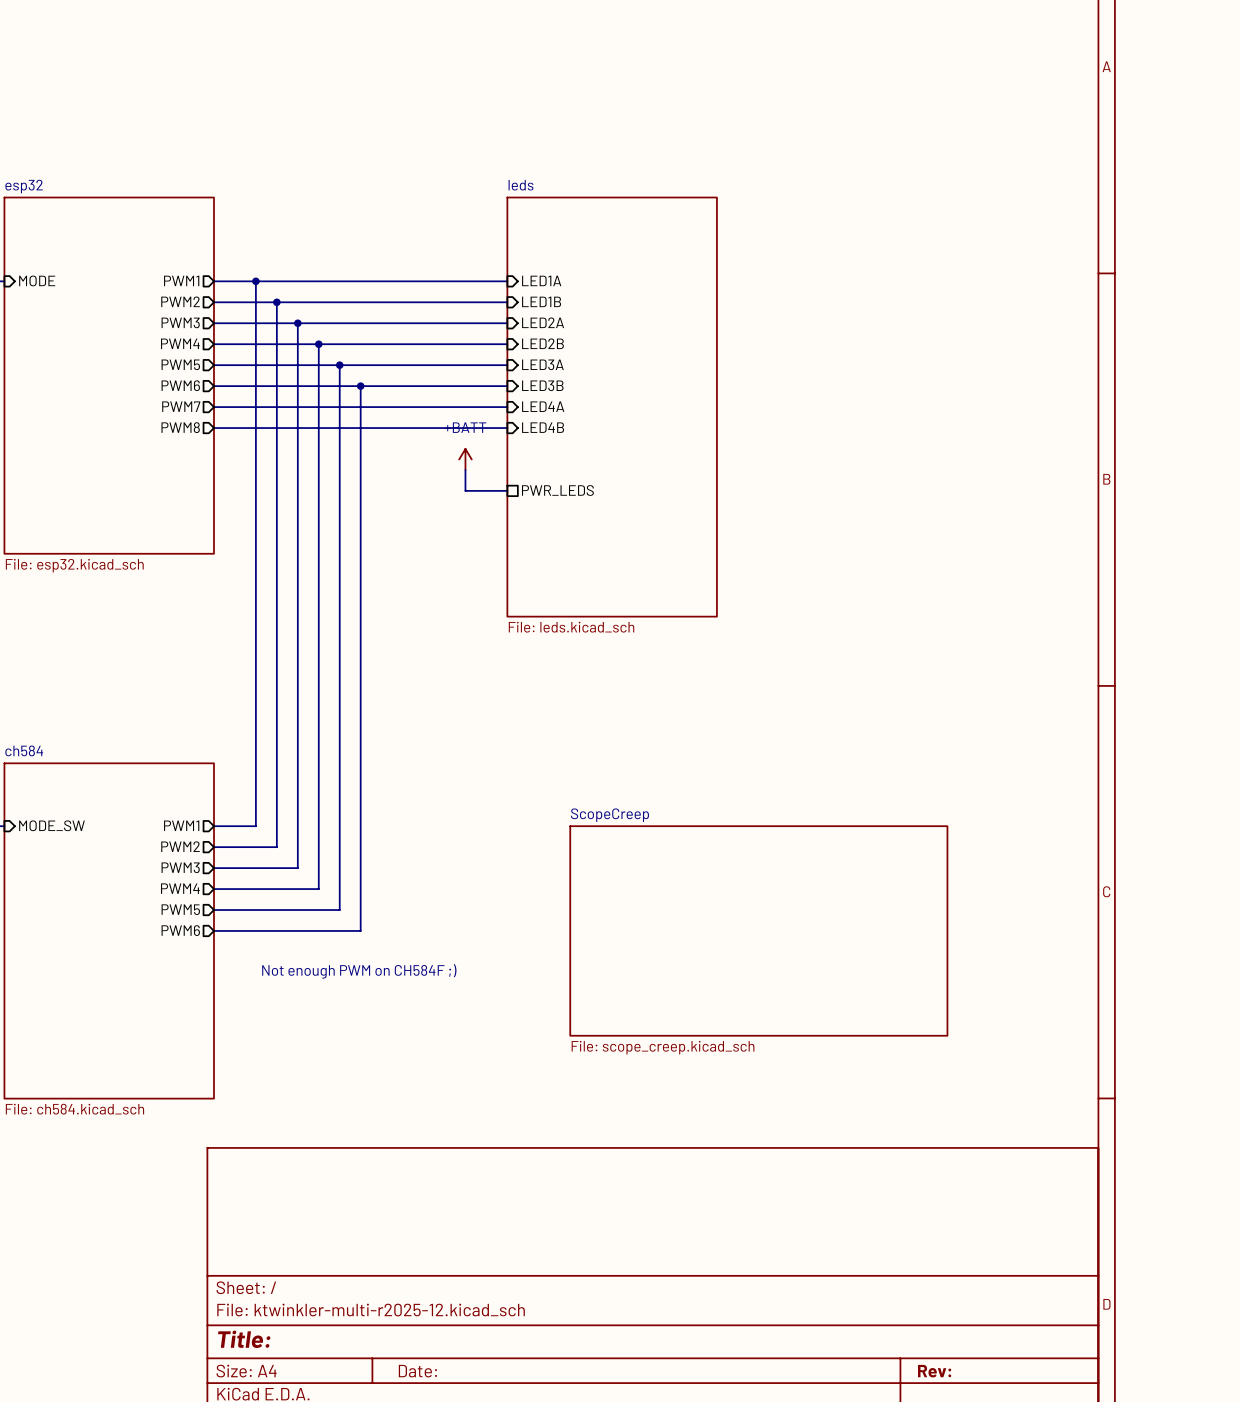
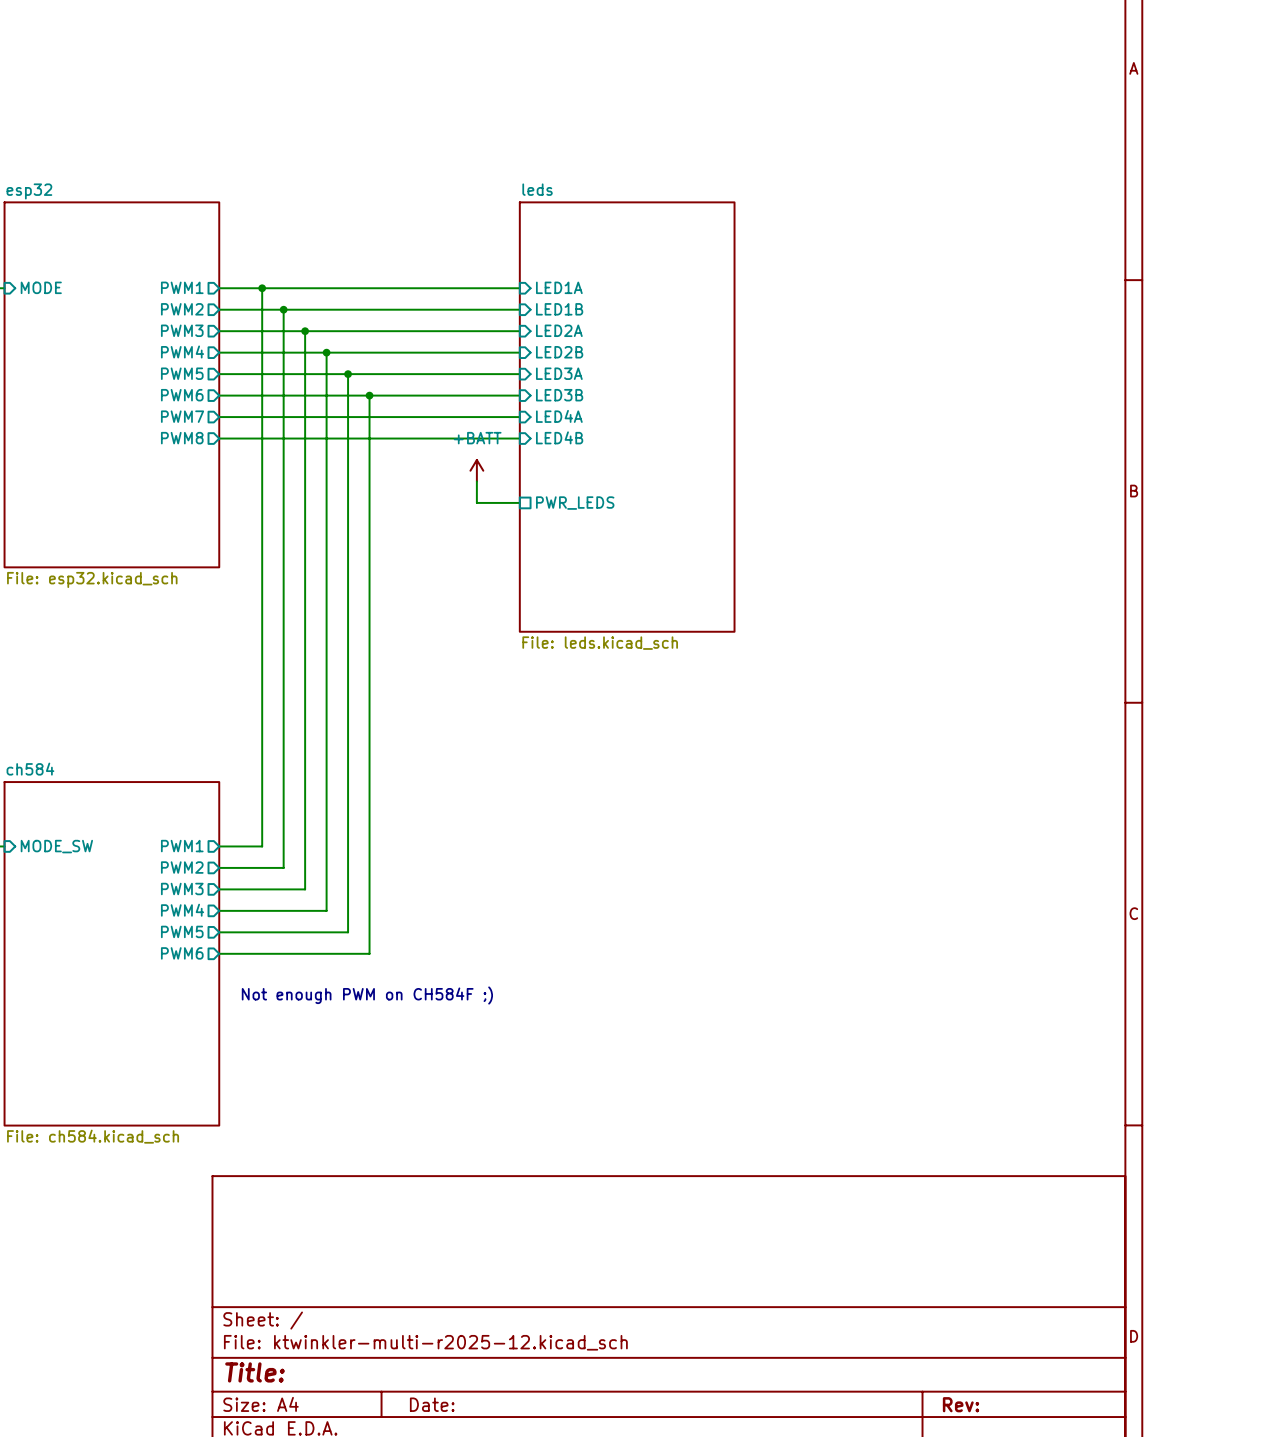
sheet ScopeCreep: File: scope_creep.kicad_sch (758, 930) -> none

